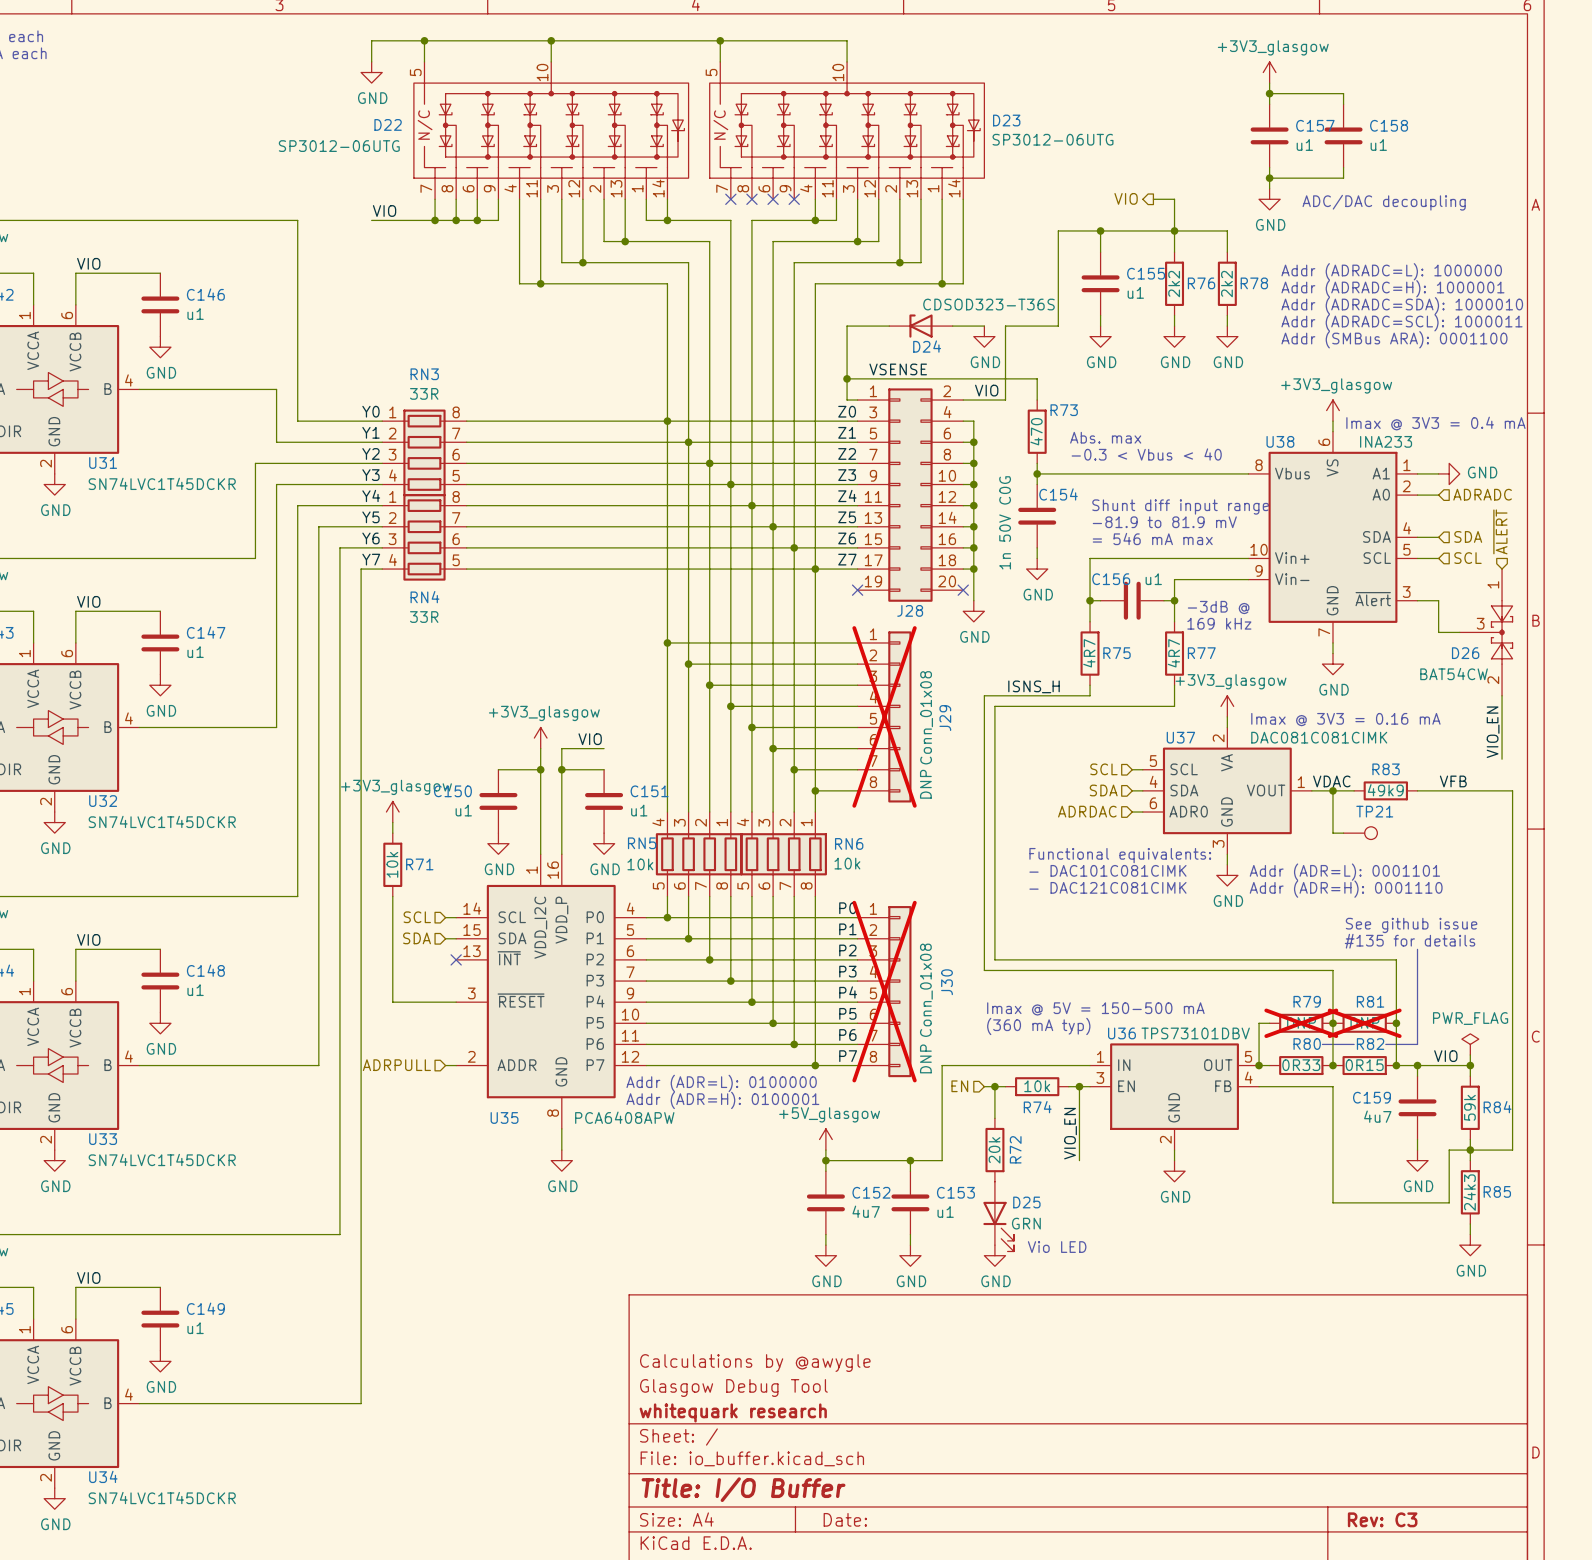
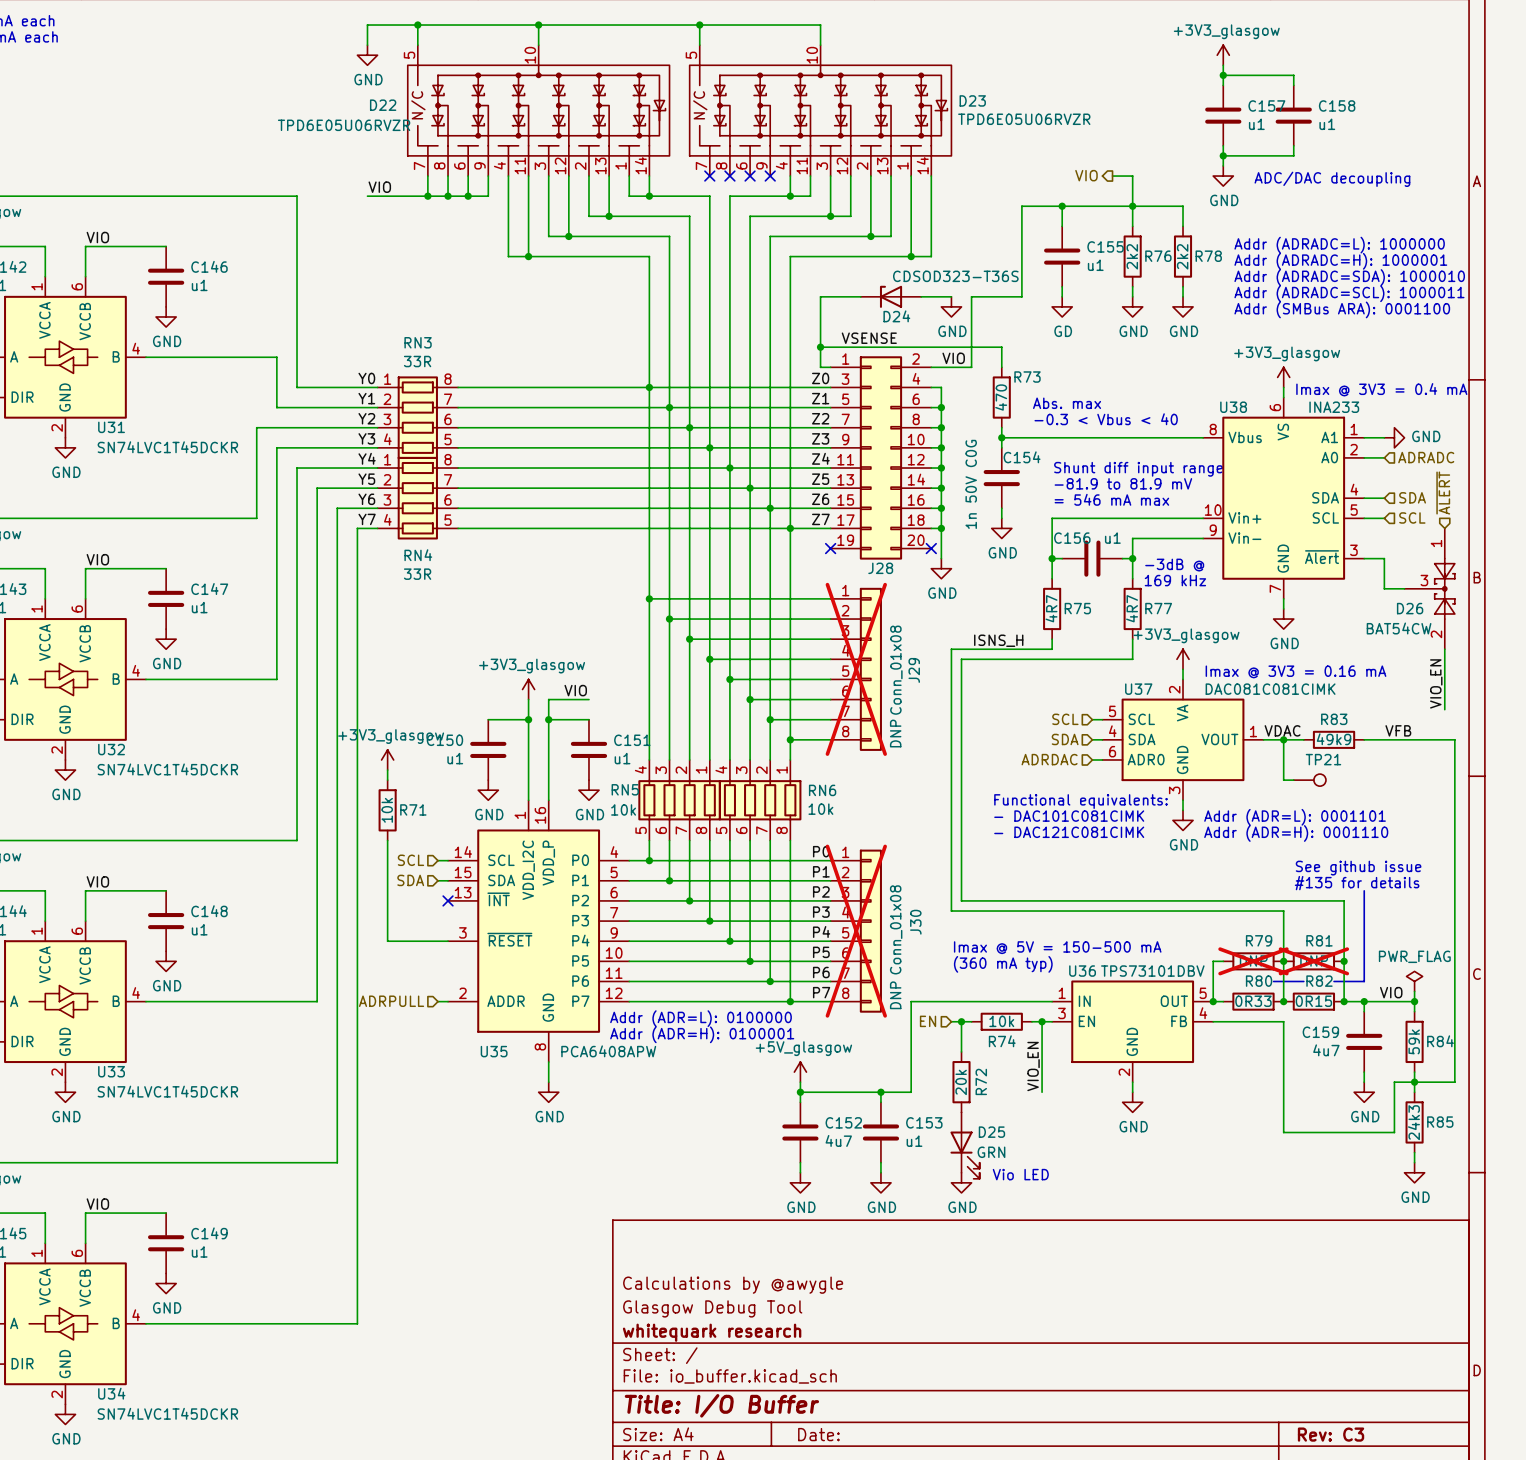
D23 value: SP3012-06UTG (1053, 139) -> TPD6E05U06RVZR (1024, 119)
D22 value: SP3012-06UTG (339, 146) -> TPD6E05U06RVZR (344, 125)
power symbol: GND (1100, 336) -> GD (1062, 306)

